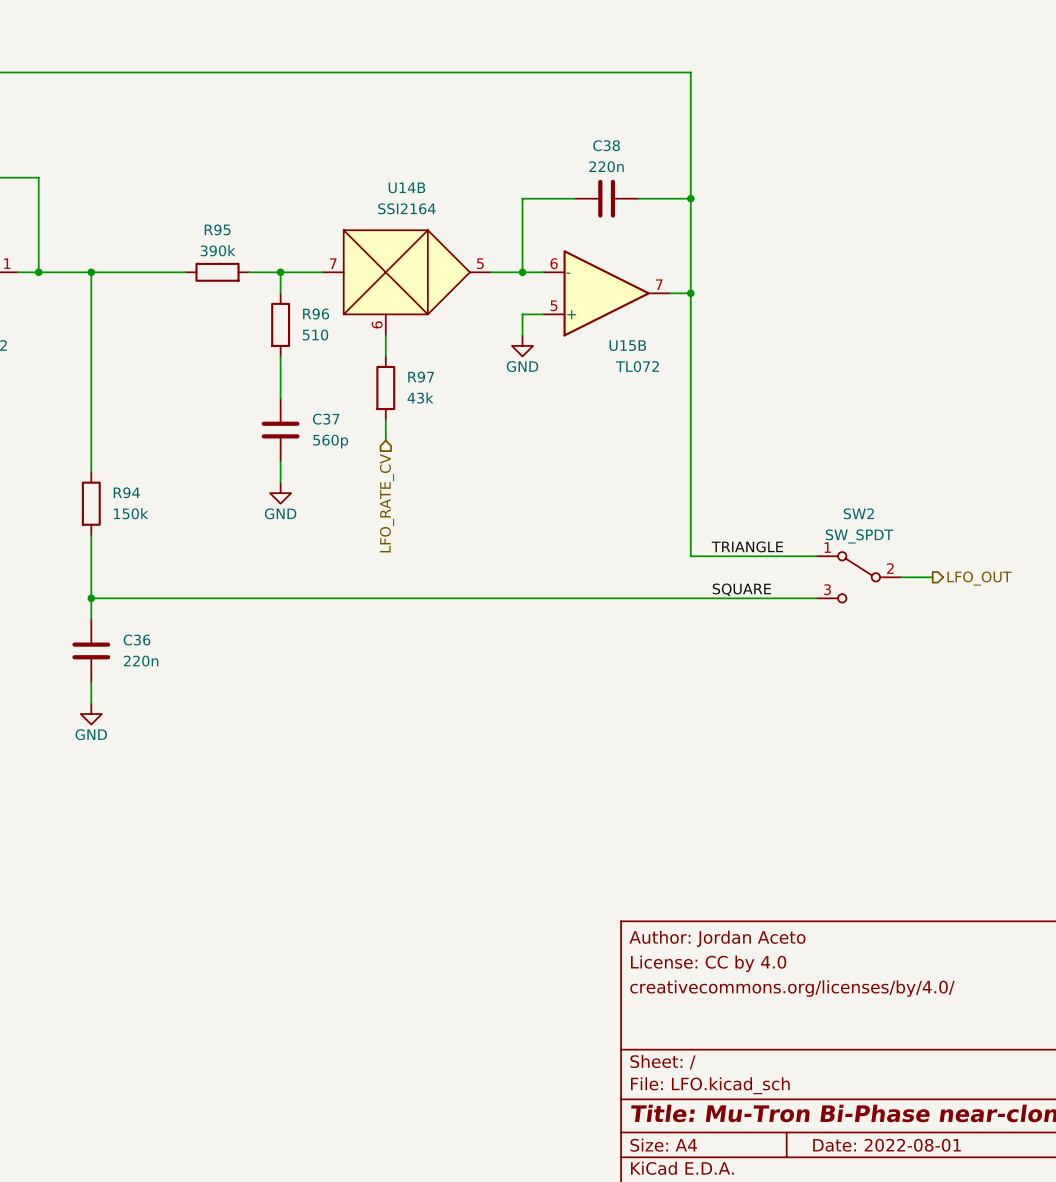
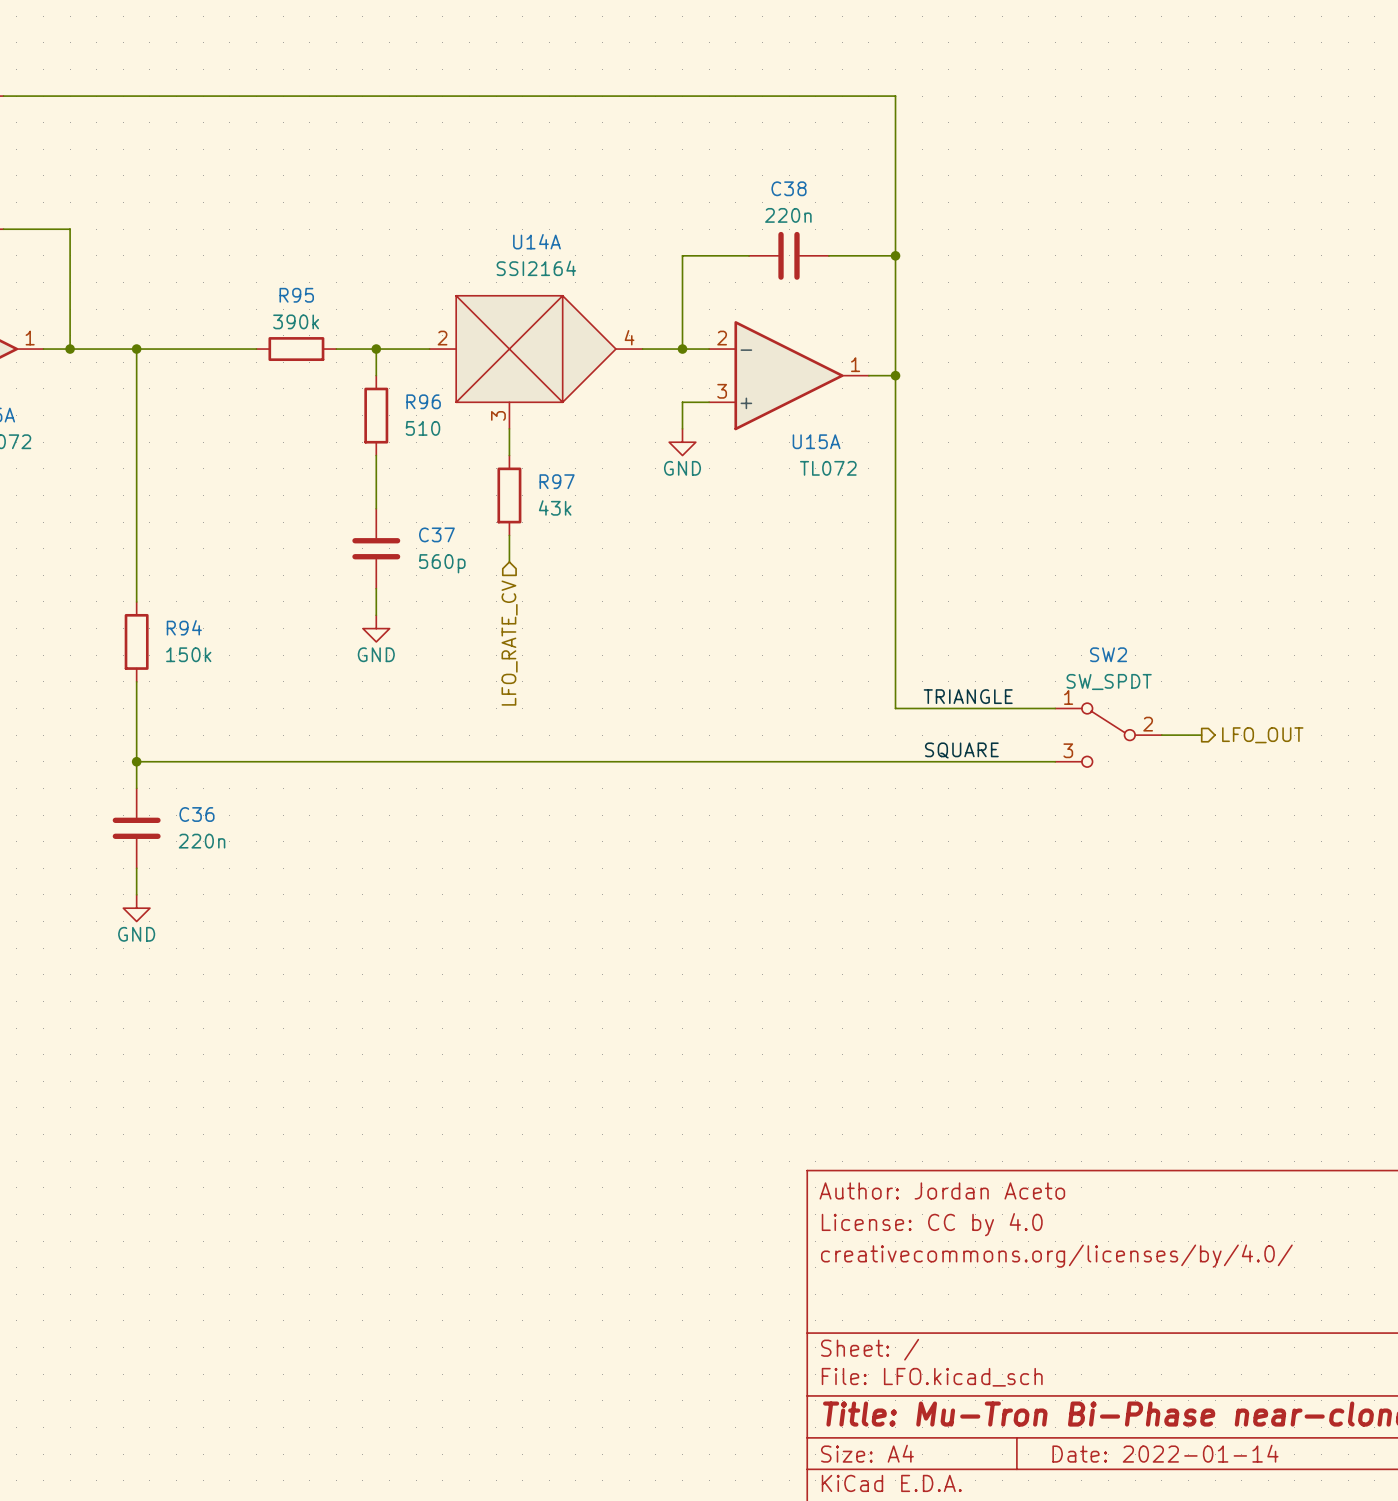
U14B name: U14B (406, 187) -> U14A (537, 241)
U14B pin number: 7 (333, 263) -> 2 (442, 338)
U14B pin number: 5 (480, 263) -> 4 (629, 337)
U15B pin number: 6 (554, 263) -> 2 (722, 338)
U15B pin number: 7 (659, 284) -> 1 (855, 364)
U15B pin number: 5 (553, 305) -> 3 (722, 391)
U14B pin number: 6 (377, 324) -> 3 (498, 415)
U15B name: U15B (627, 345) -> U15A (816, 441)
title block: Date: 2022-08-01 (887, 1145) -> Date: 2022-01-14 (1165, 1453)

